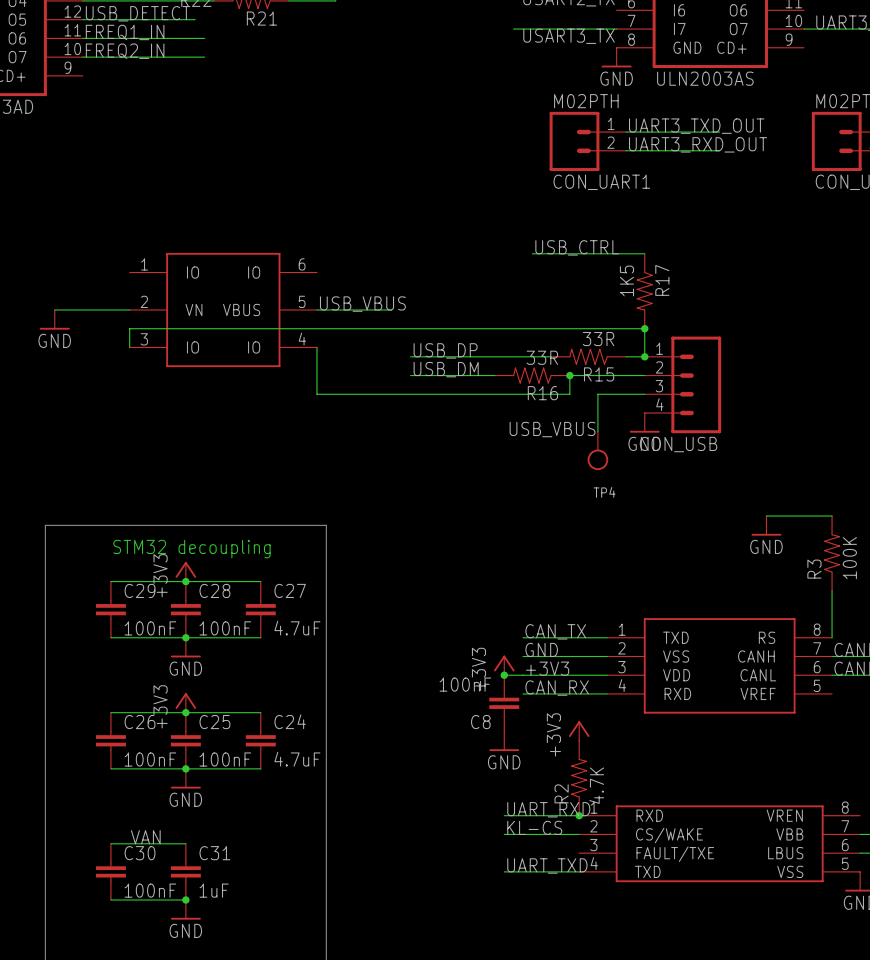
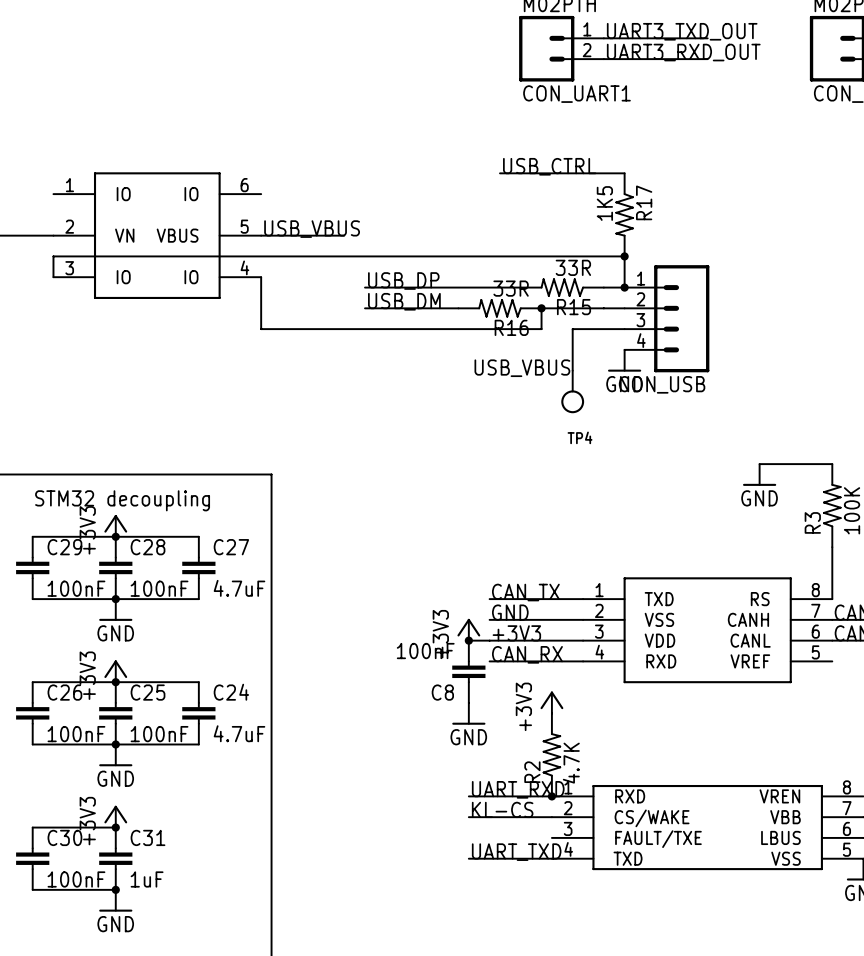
power symbol: none -> +3V3 (115, 816)
label: VAN (145, 837) -> none
junction: none -> (115, 827)

